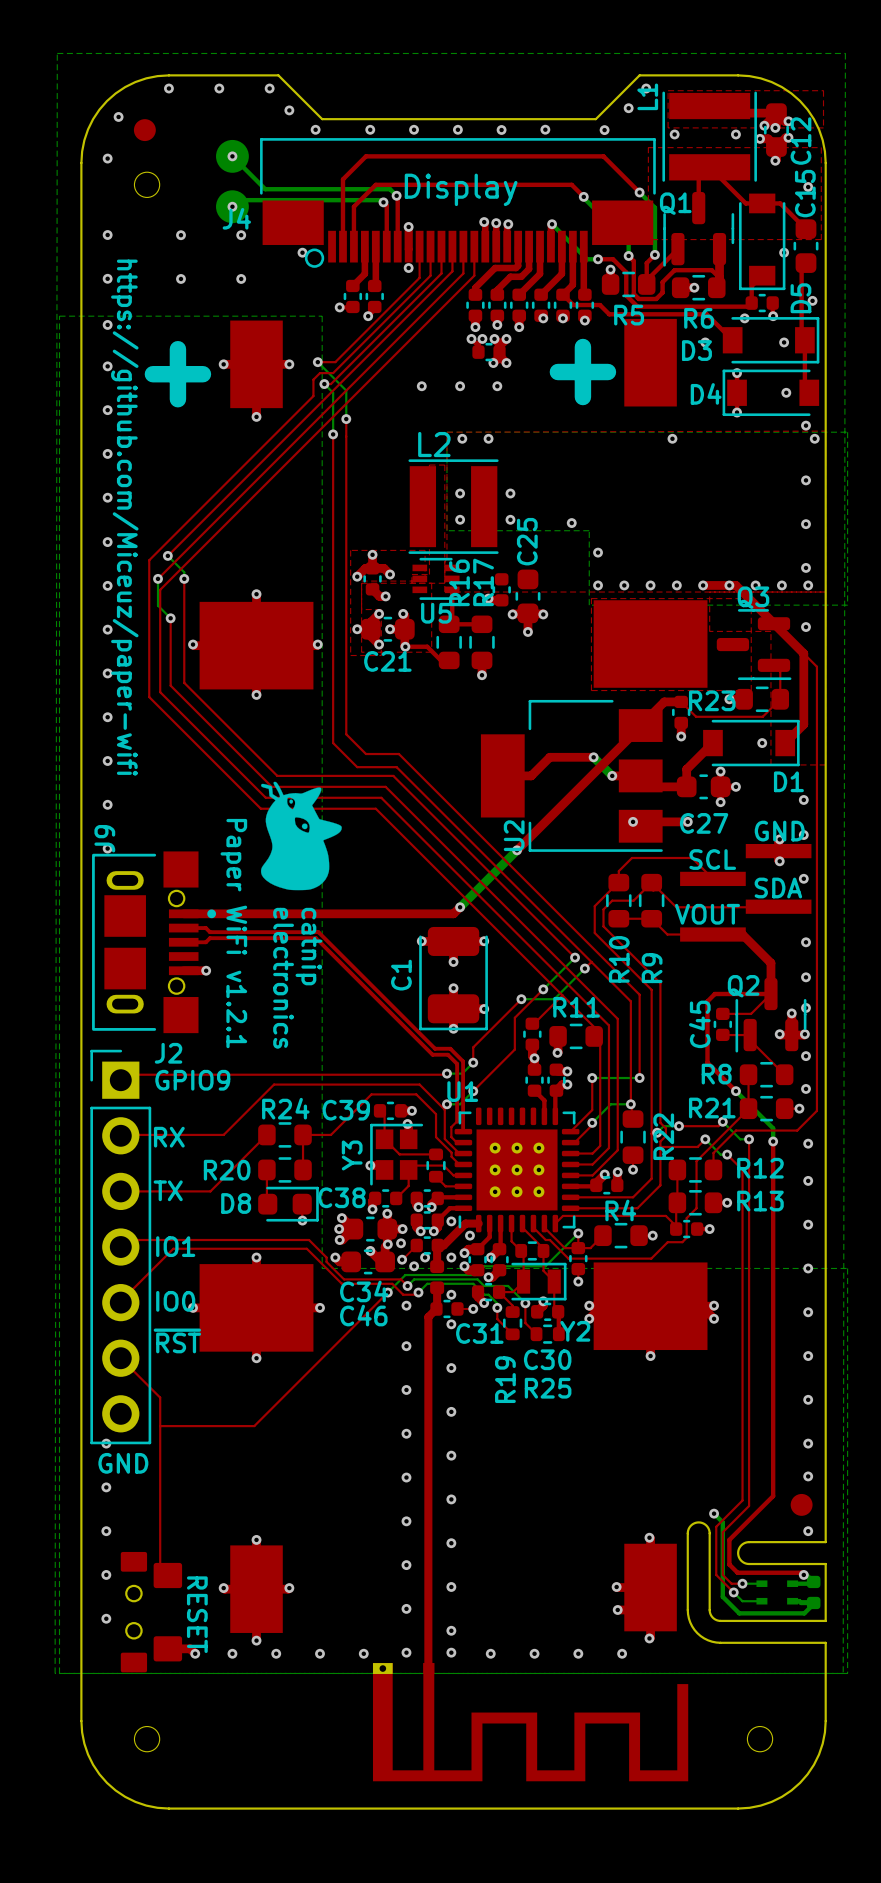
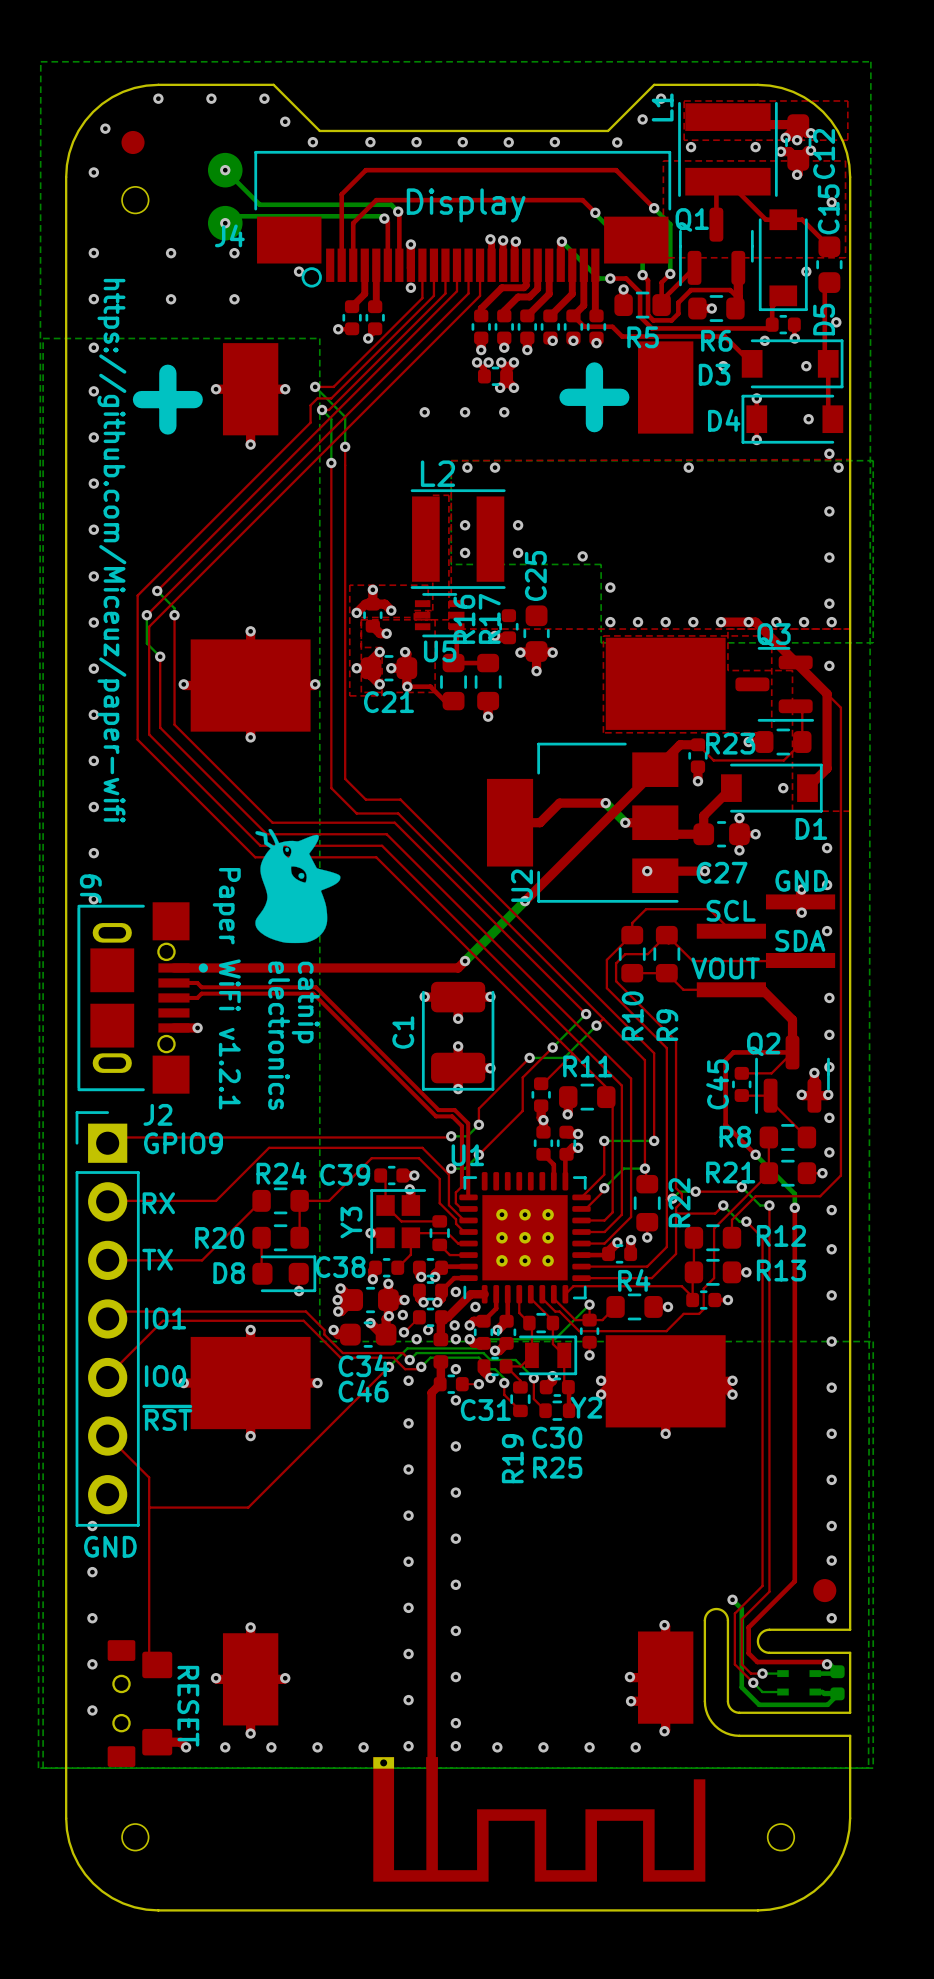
via: none -> (454, 1325)
via: (451, 1257) -> none
via: none -> (455, 1339)

